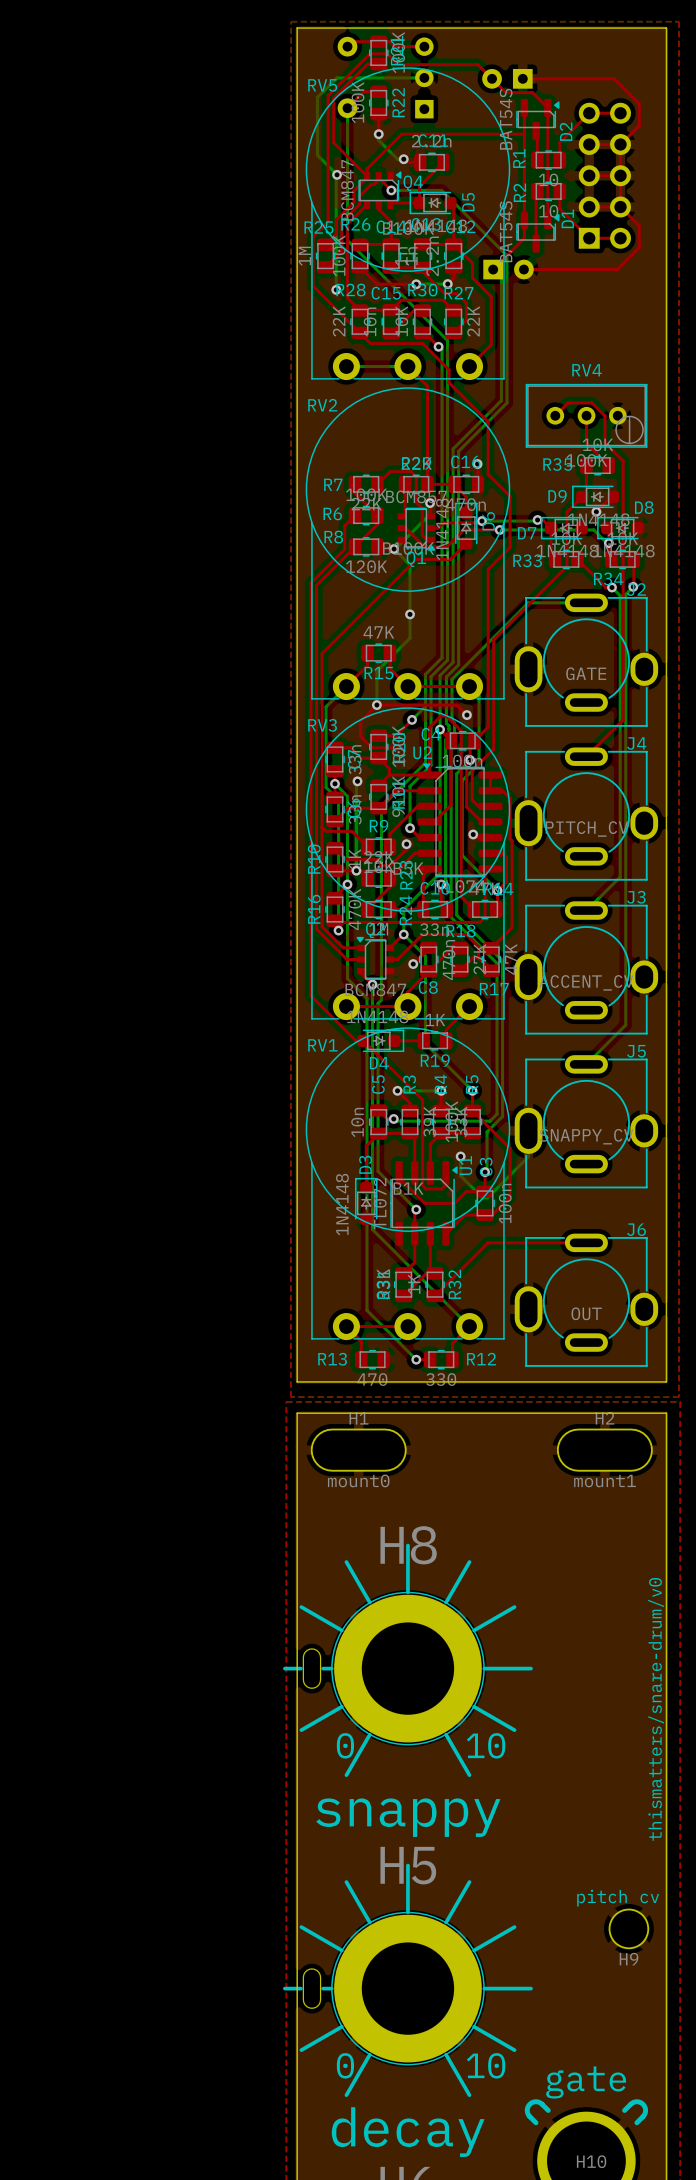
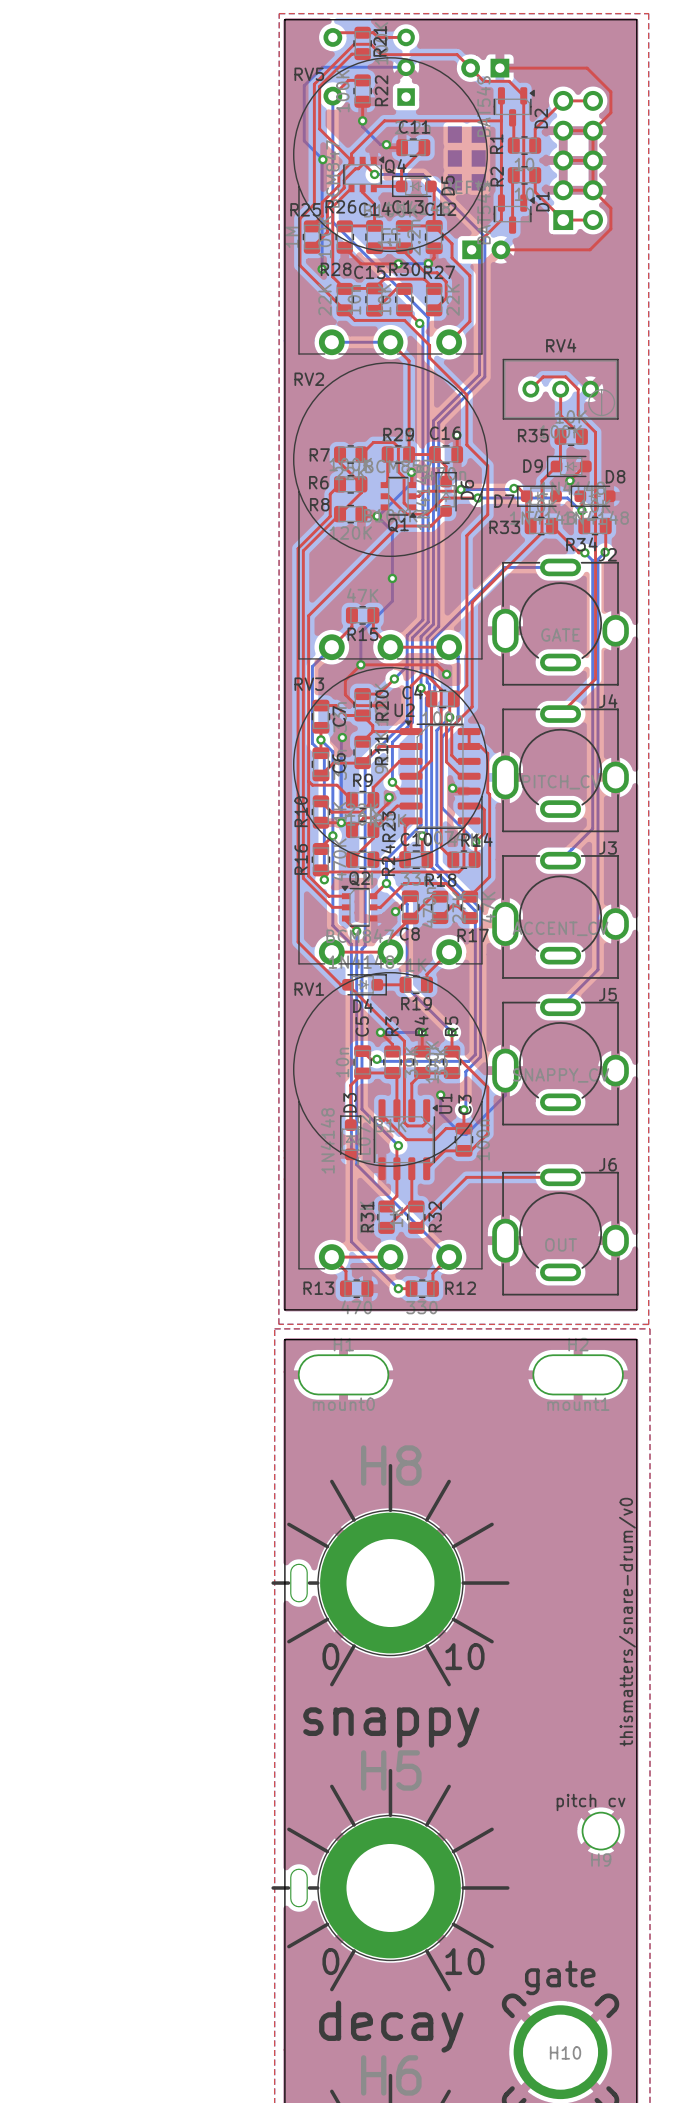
part: none -> (466, 158)

